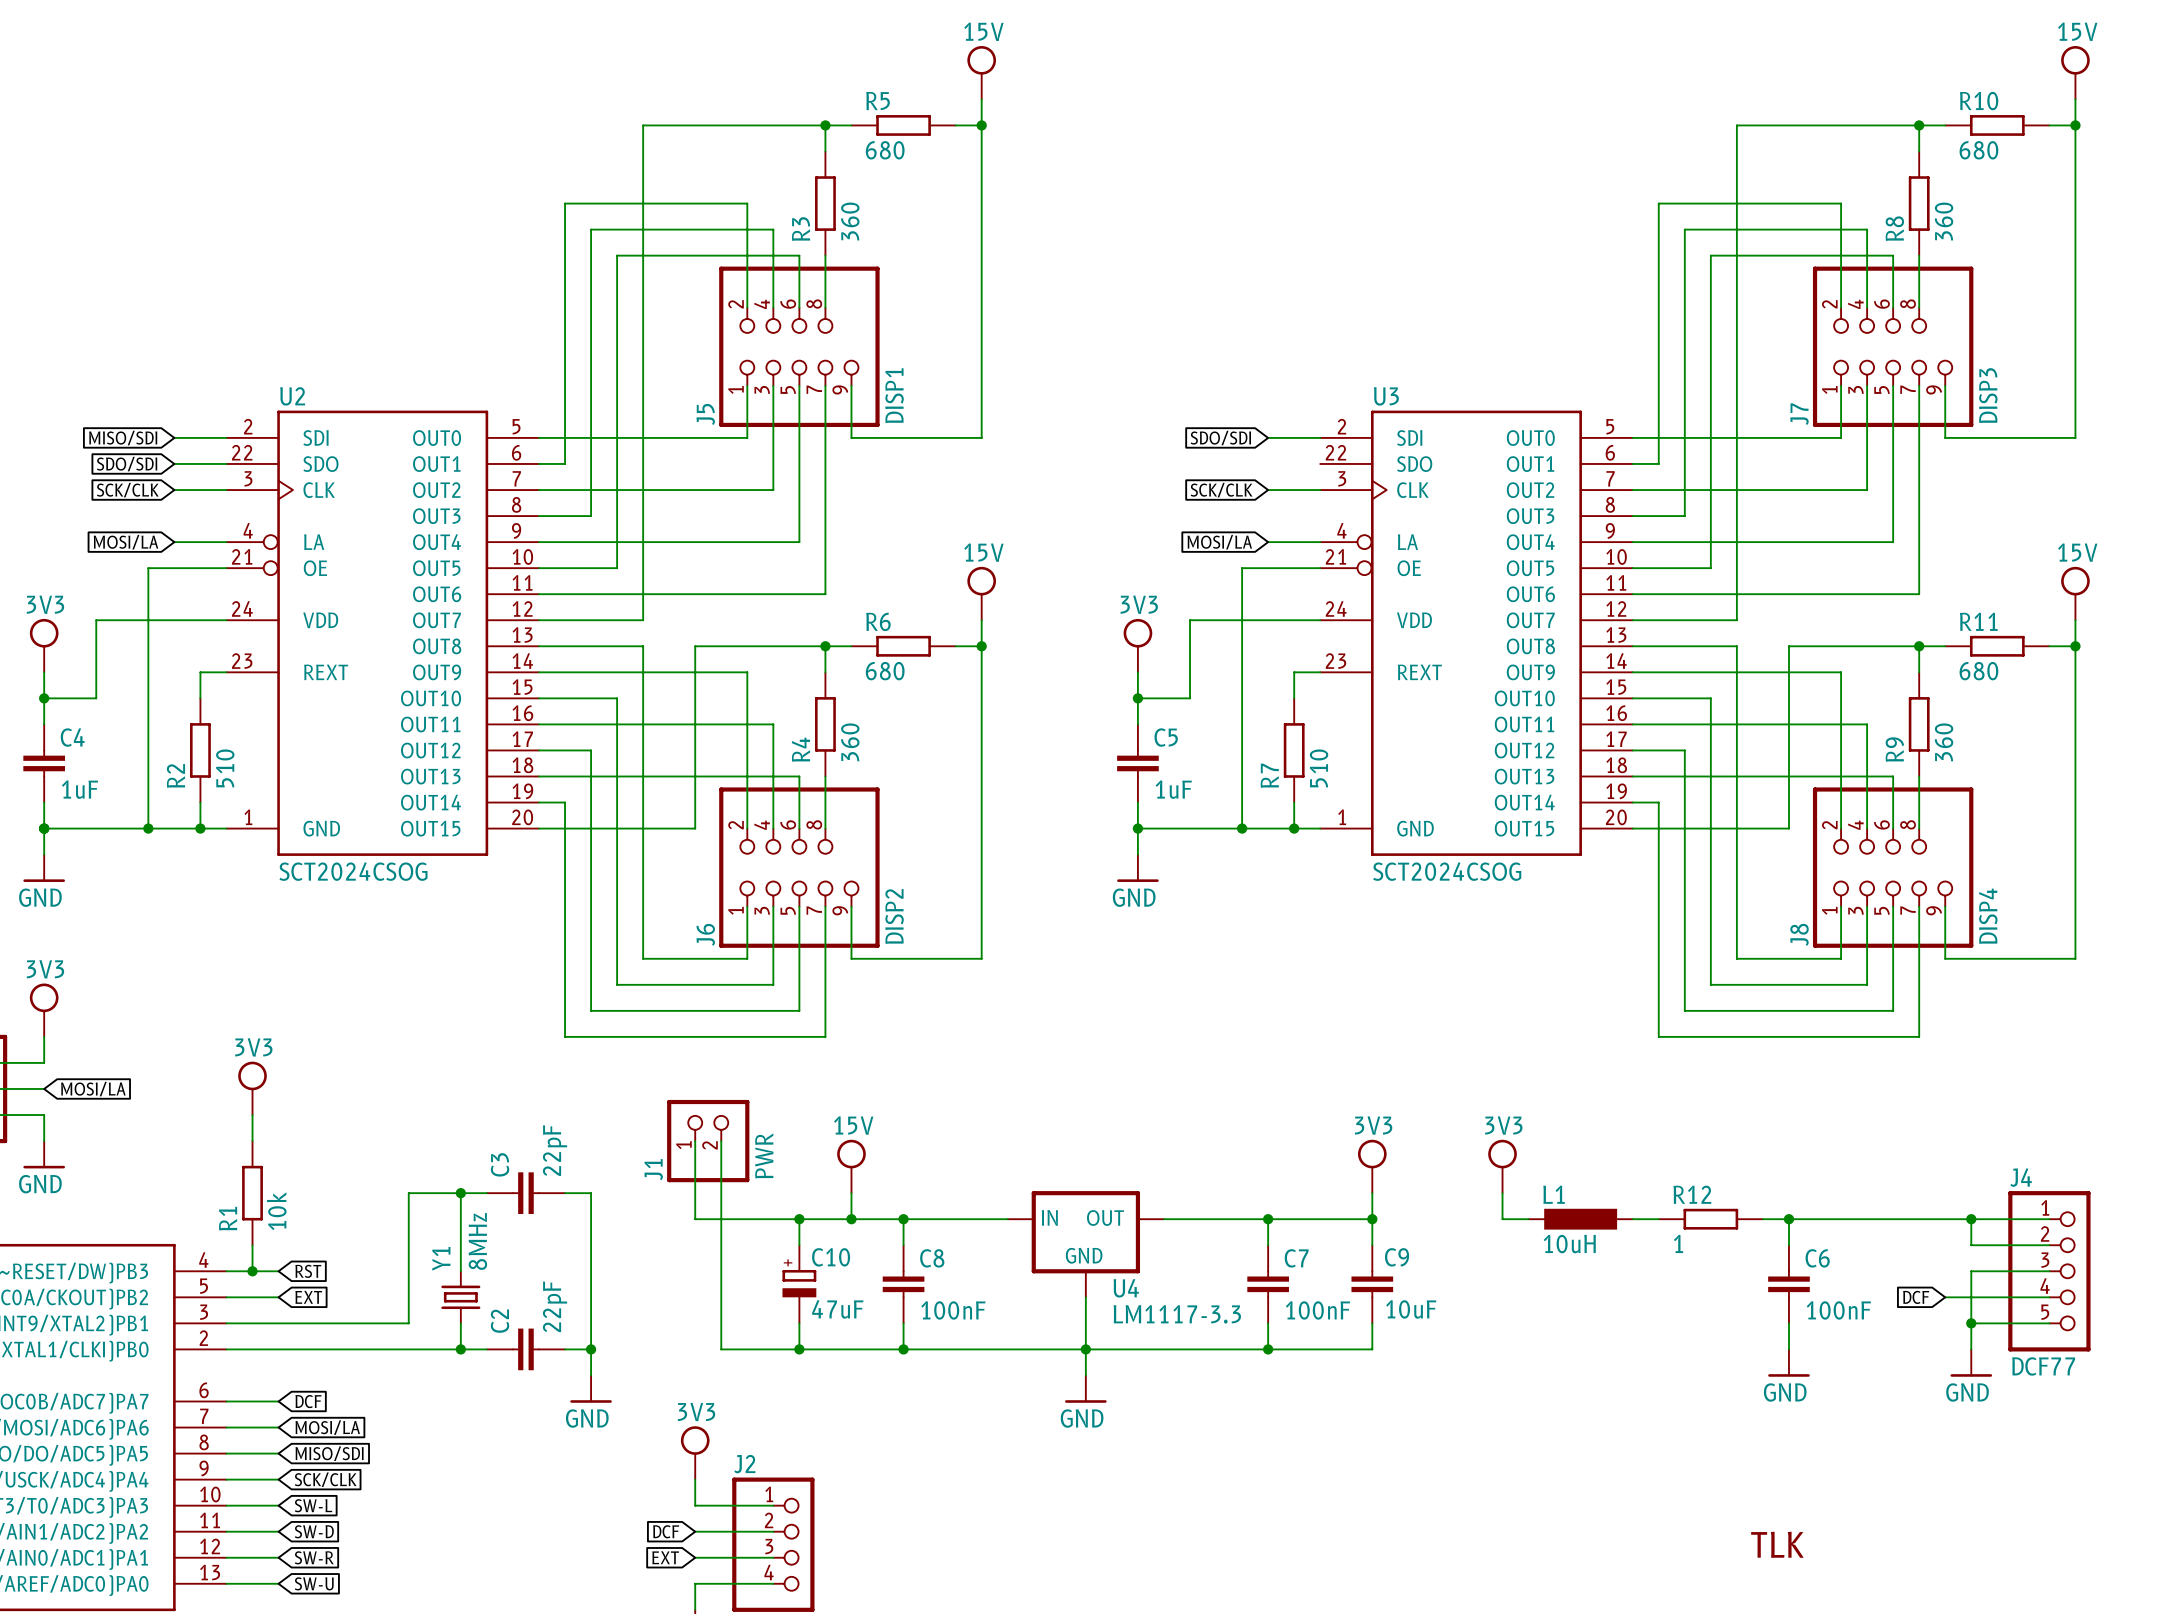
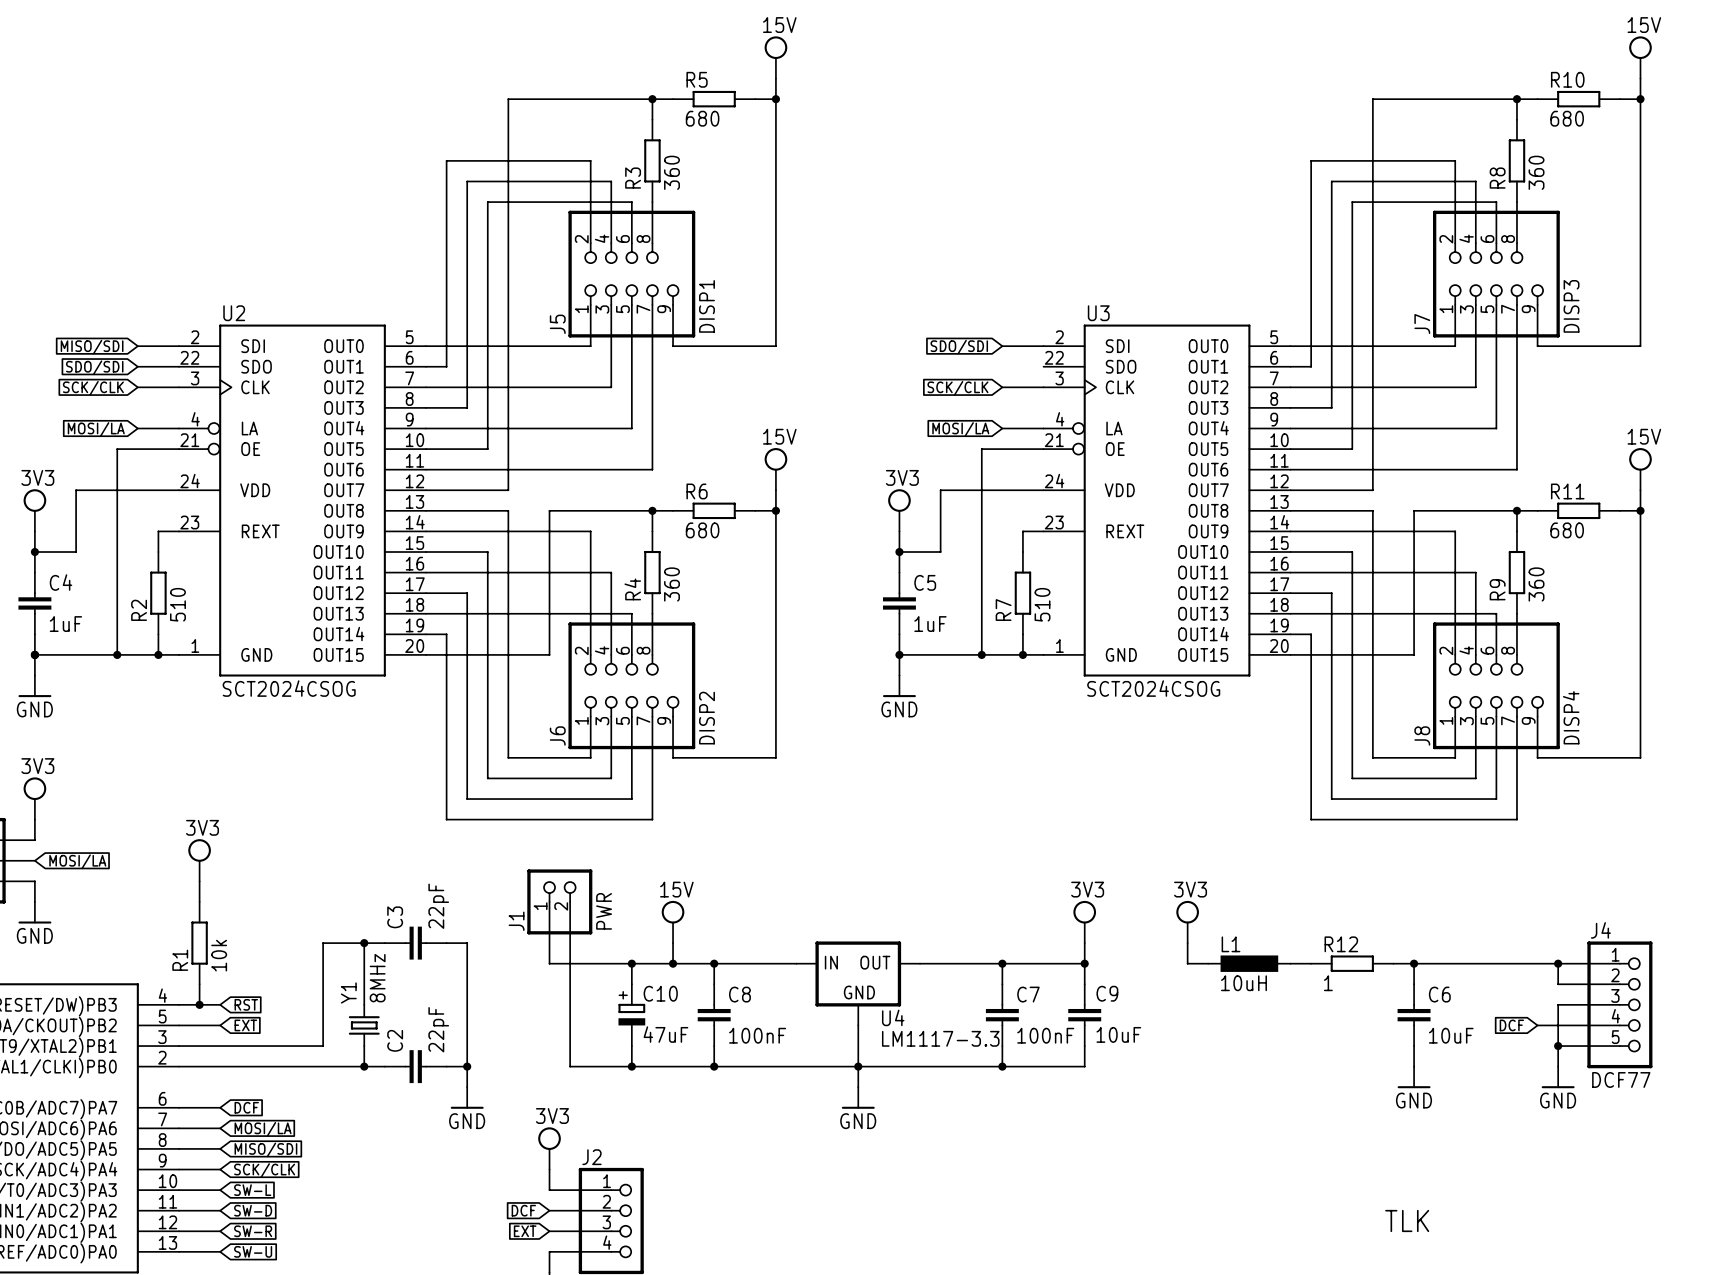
C6 value: 100nF (1838, 1310) -> 10uF (1451, 1035)

